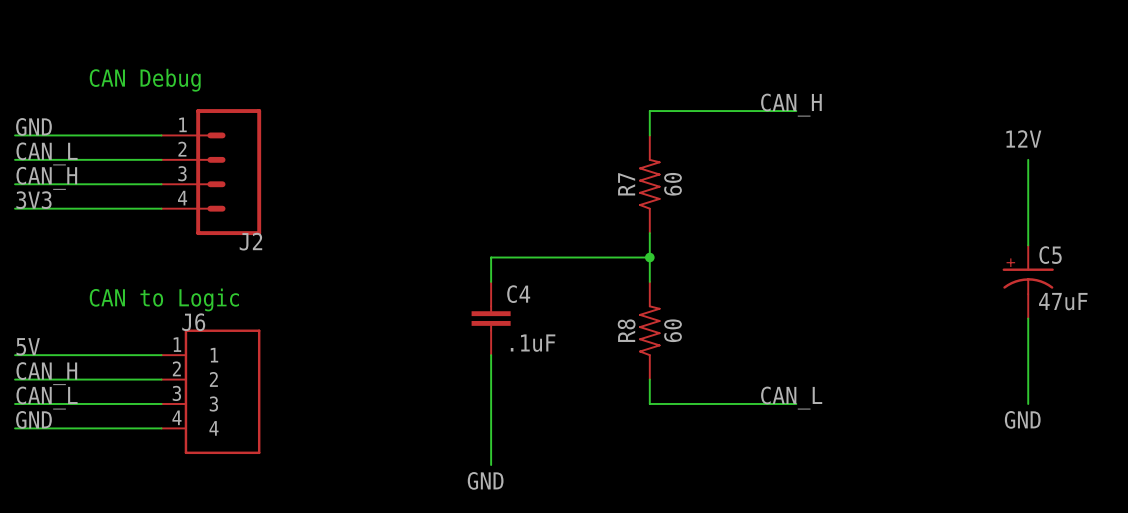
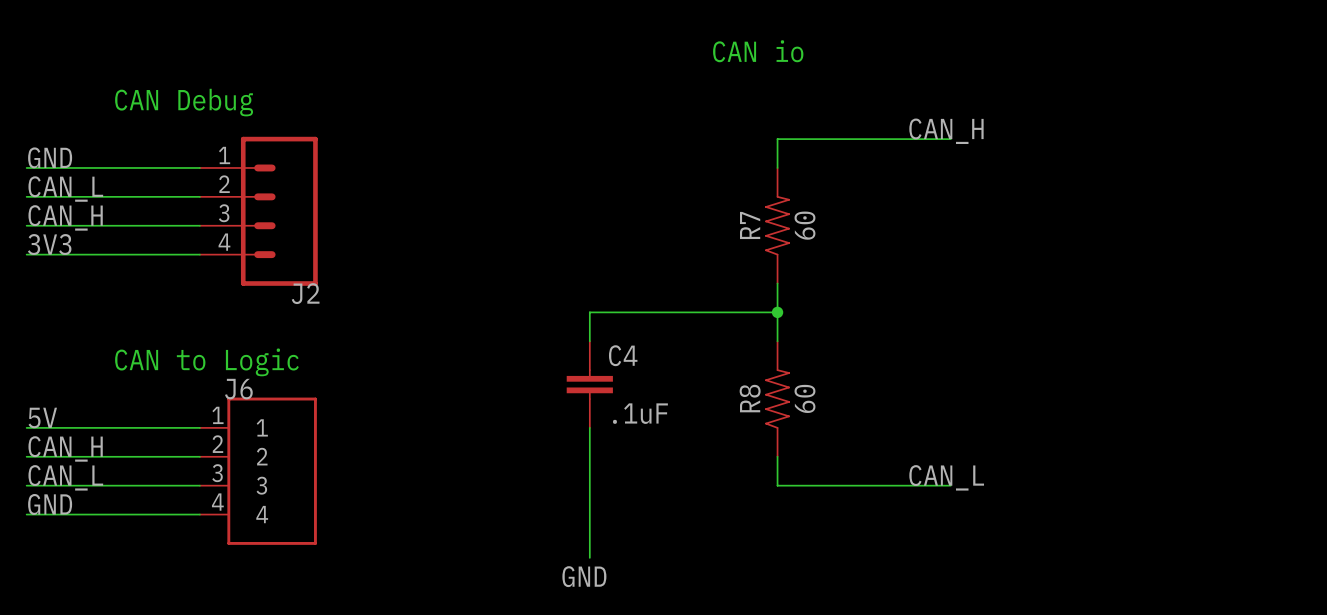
text: none -> CAN io (758, 51)
label: 12V (1023, 138) -> none
wire: (1028, 159) (1028, 245) -> none
C5: 47uF (1028, 281) -> none
wire: (1028, 318) (1028, 403) -> none
label: GND (1022, 419) -> none

